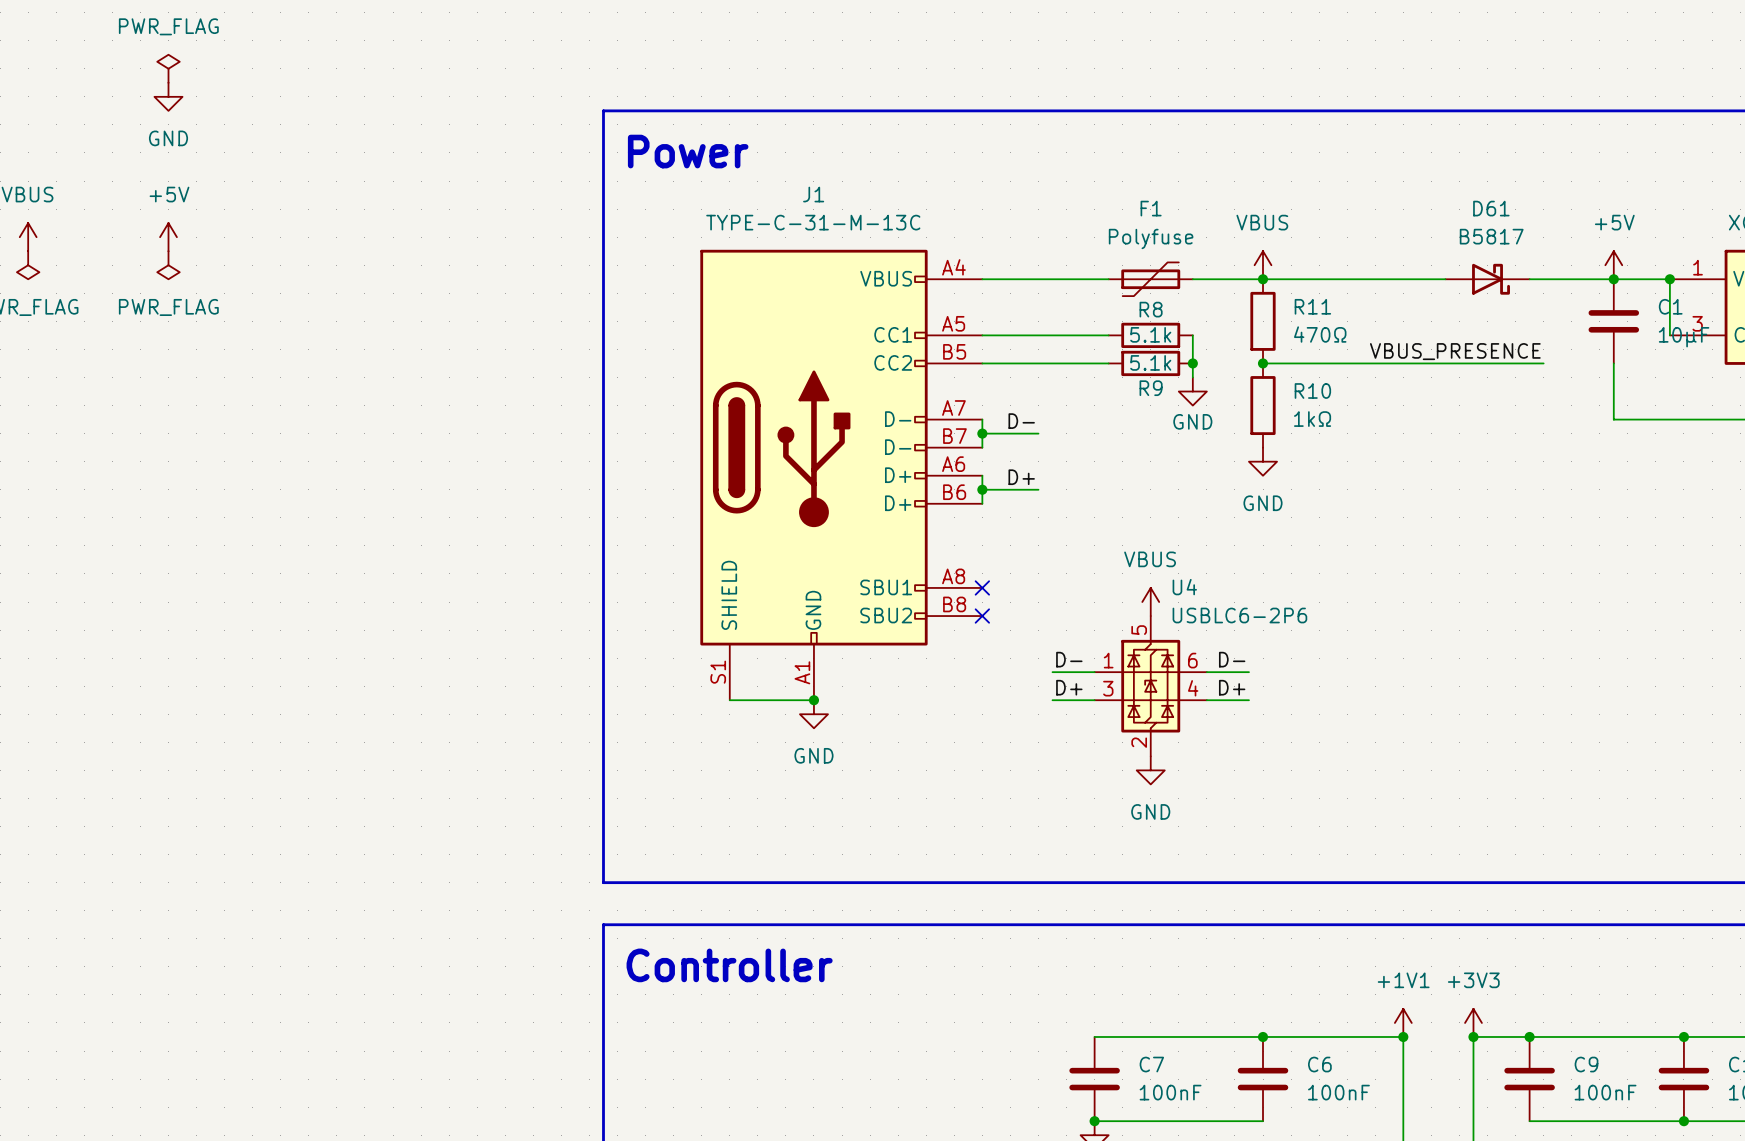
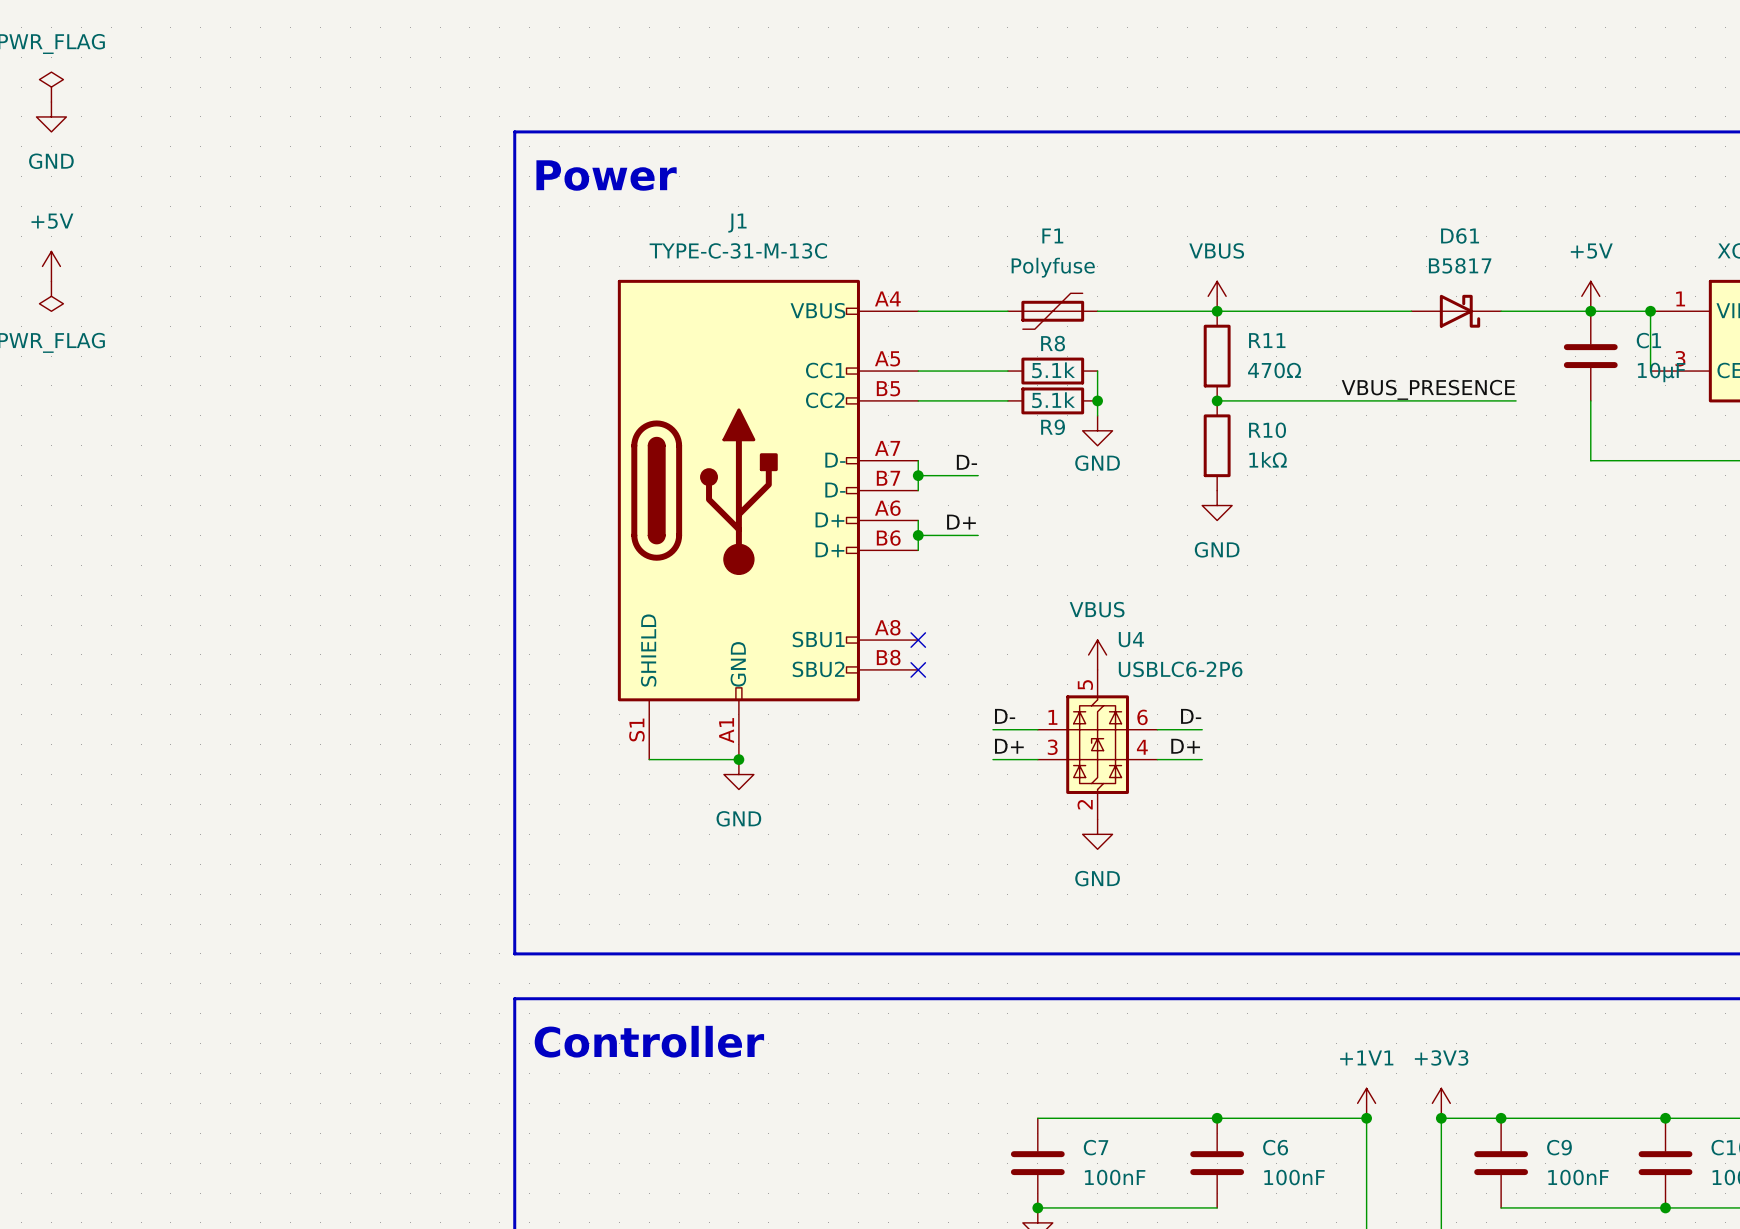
F1 position: (1150, 279) -> (1052, 311)
wire: (1066, 335) (1108, 335) -> none
R8 position: (1150, 335) -> (1052, 371)
wire: (1192, 335) (1192, 377) -> (1097, 371) (1097, 415)
wire: (1066, 363) (1108, 363) -> none
R9 position: (1150, 363) -> (1052, 400)
junction position: (1192, 363) -> (1097, 400)
power symbol position: GND (1192, 391) -> GND (1097, 430)

